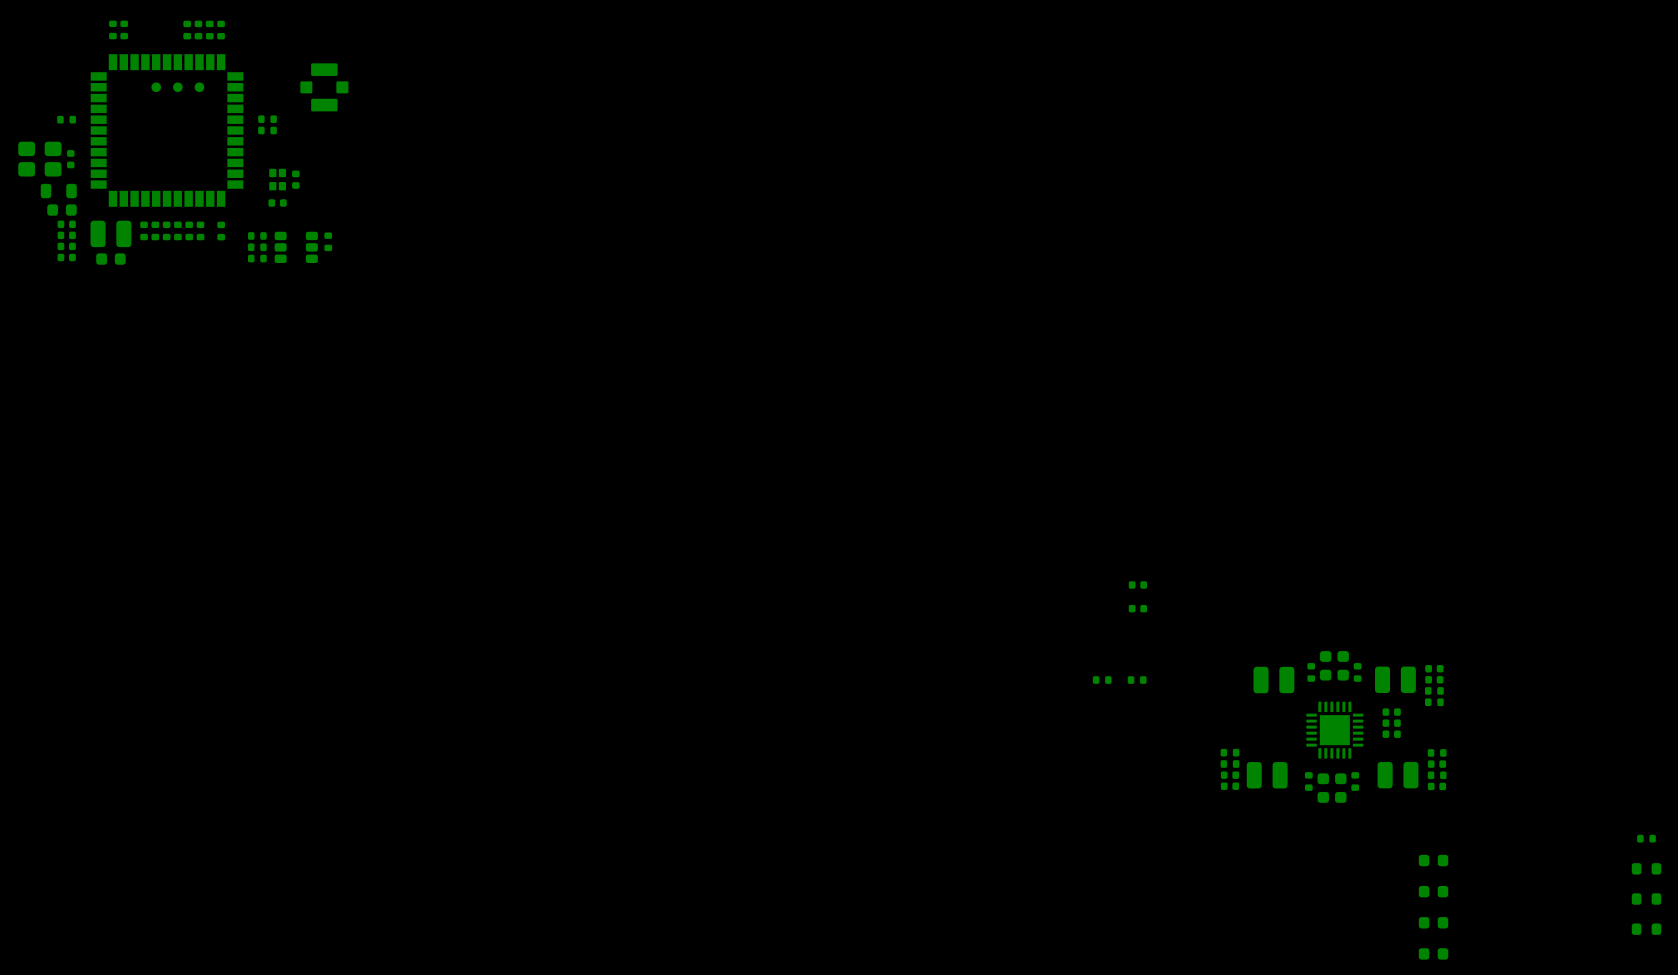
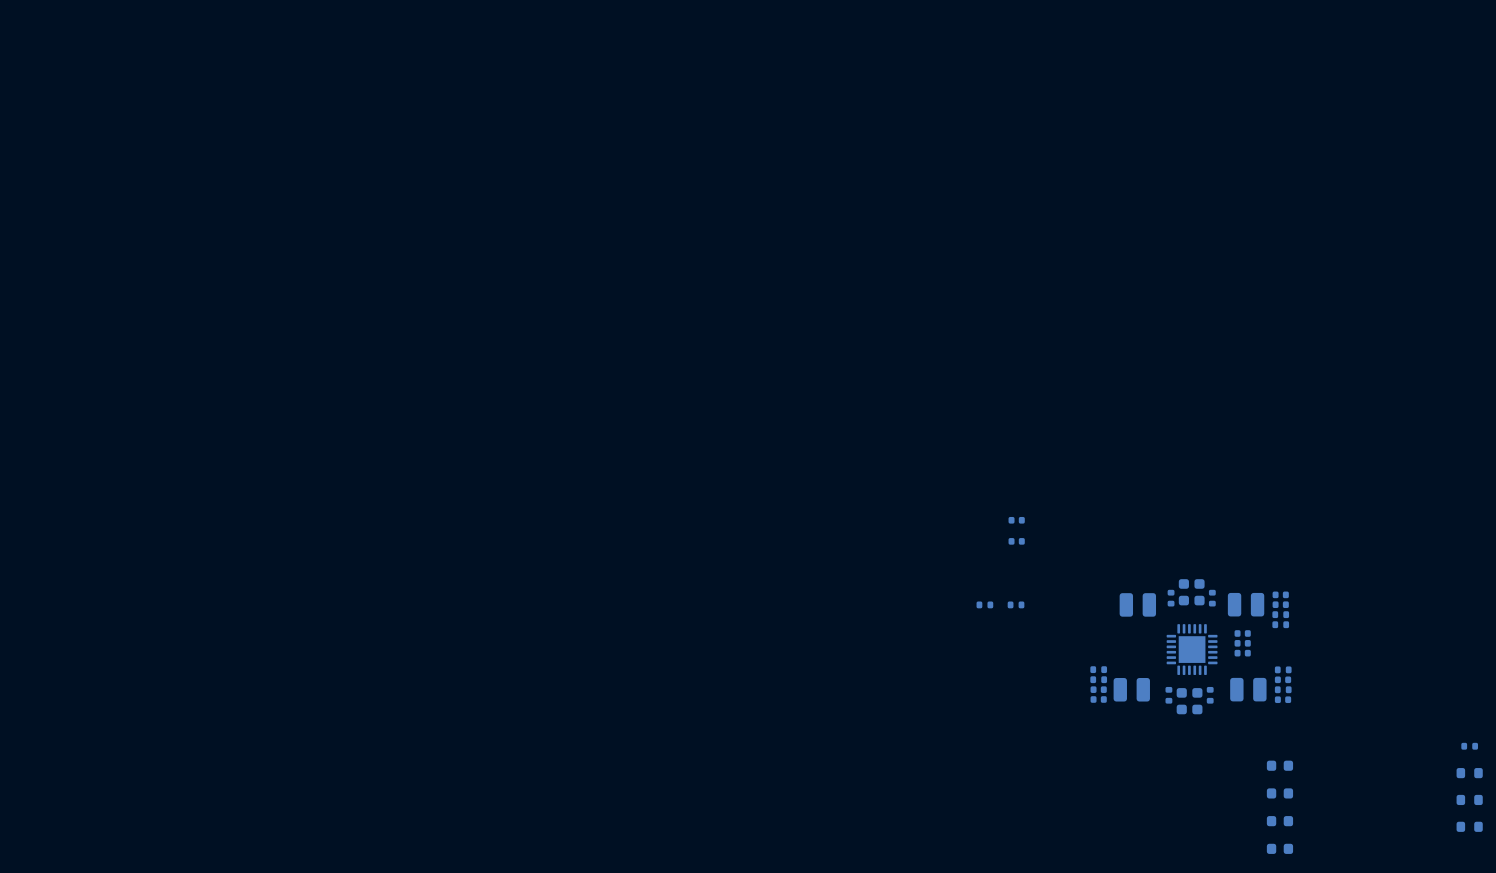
part: (112, 29) -> none
part: (124, 29) -> none
part: (187, 30) -> none
part: (198, 30) -> none
part: (209, 30) -> none
part: (221, 30) -> none
part: (324, 87) -> none
part: (66, 119) -> none
part: (267, 119) -> none
part: (167, 130) -> none
part: (267, 130) -> none
part: (39, 159) -> none
part: (70, 159) -> none
part: (277, 179) -> none
part: (295, 179) -> none
part: (58, 191) -> none
part: (277, 202) -> none
part: (62, 210) -> none
part: (66, 224) -> none
part: (144, 230) -> none
part: (155, 230) -> none
part: (166, 230) -> none
part: (177, 230) -> none
part: (189, 230) -> none
part: (200, 230) -> none
part: (221, 231) -> none
part: (110, 233) -> none
part: (66, 235) -> none
part: (257, 235) -> none
part: (328, 241) -> none
part: (66, 246) -> none
part: (257, 247) -> none
part: (296, 247) -> none
part: (66, 257) -> none
part: (257, 258) -> none
part: (110, 259) -> none

